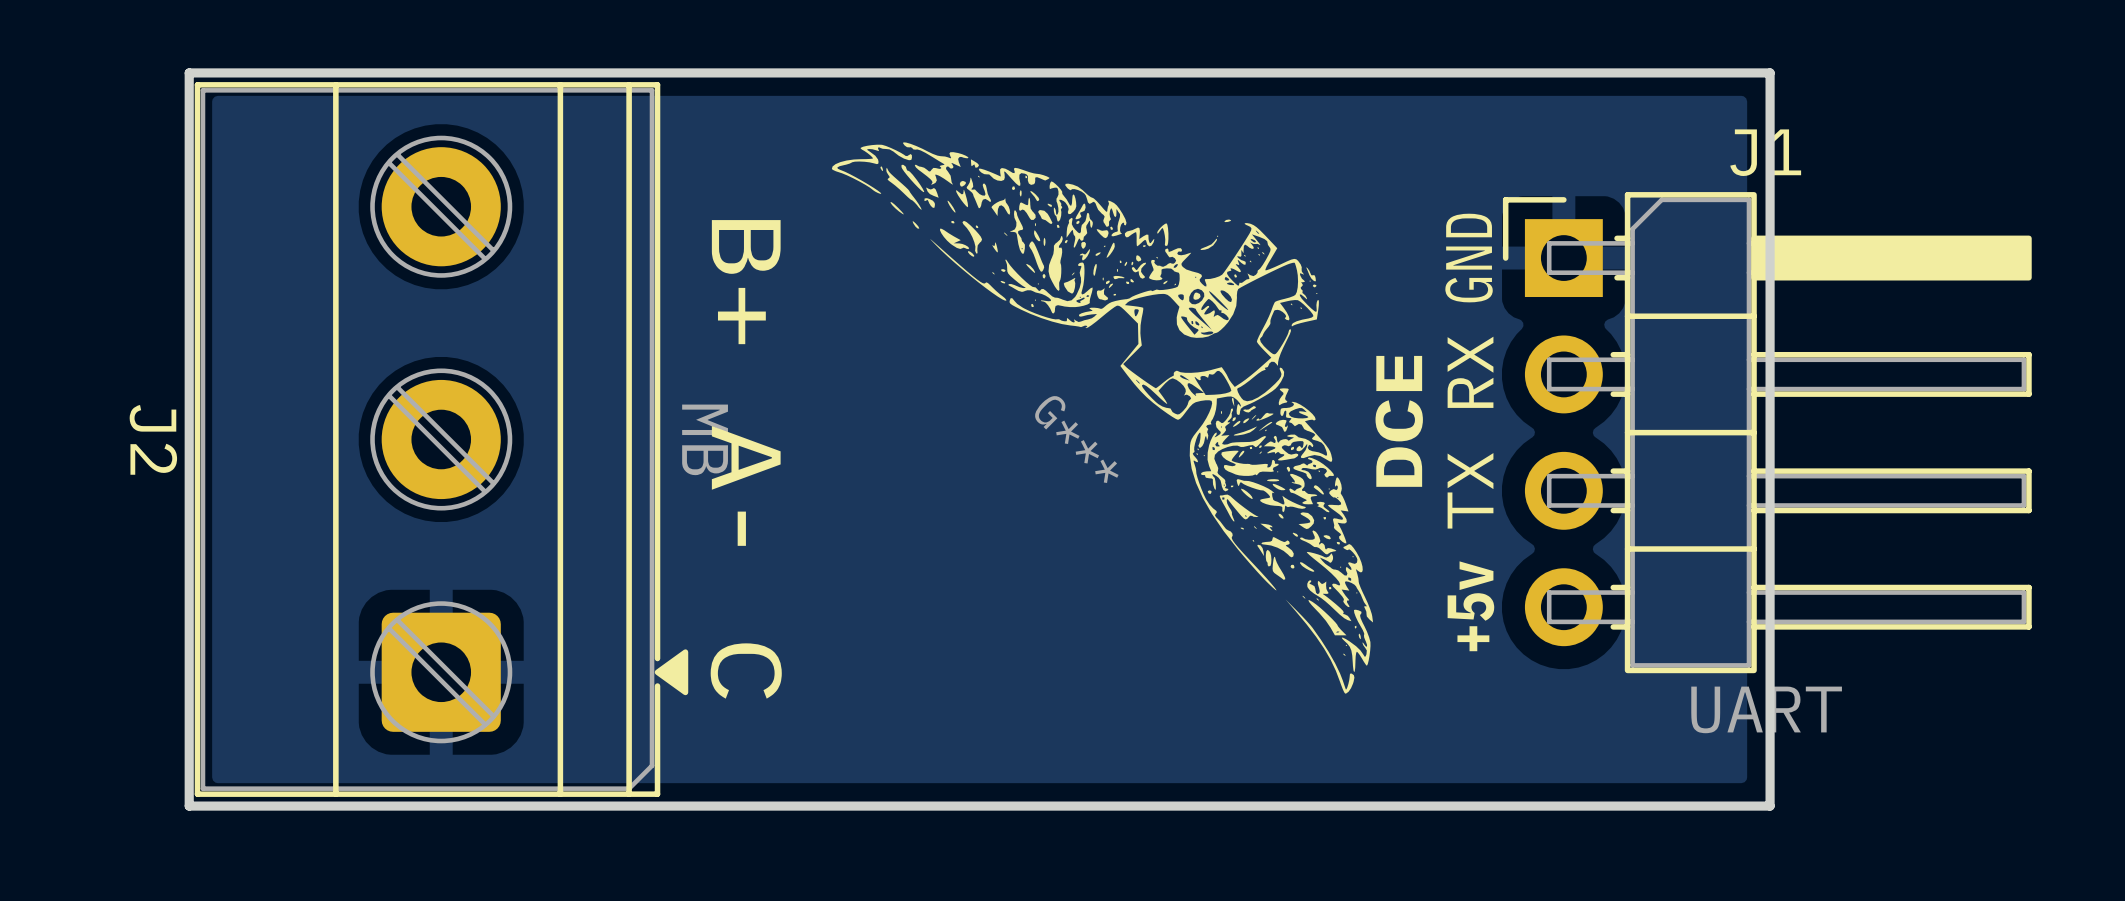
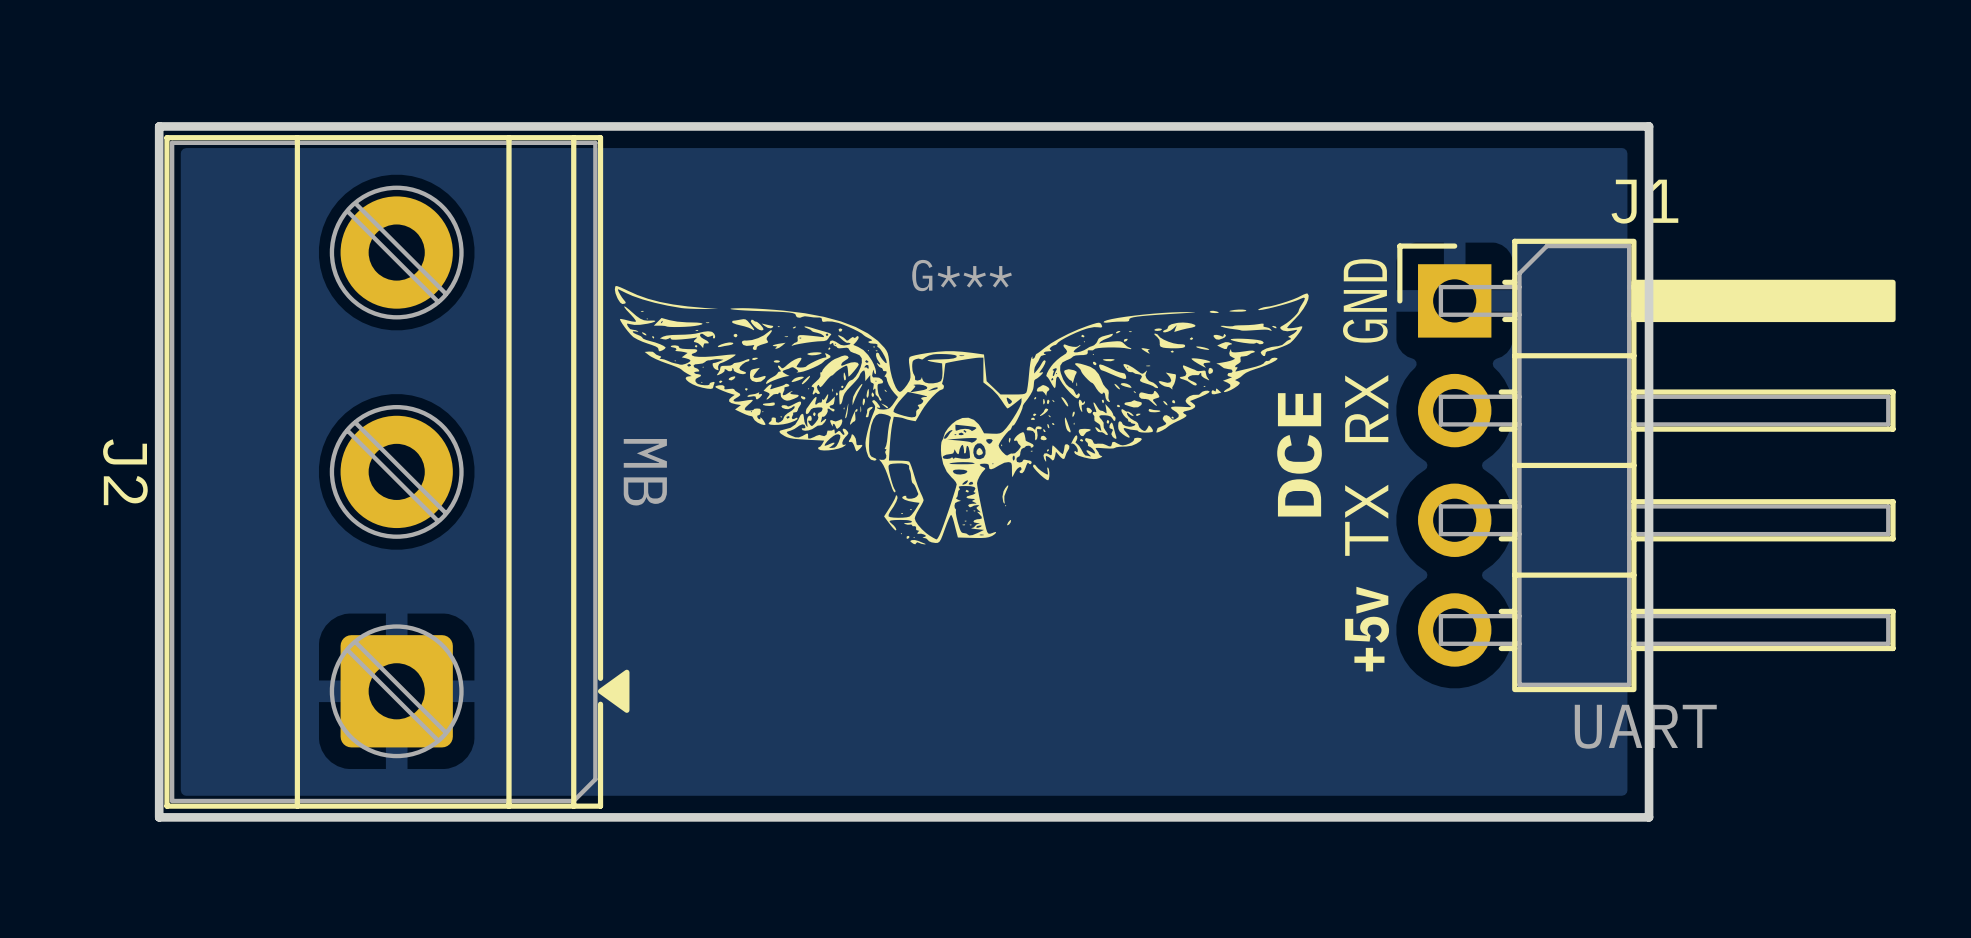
G***: none -> (961, 415)
G***: (1102, 417) -> none
text: B+ A- C (746, 459) -> none

